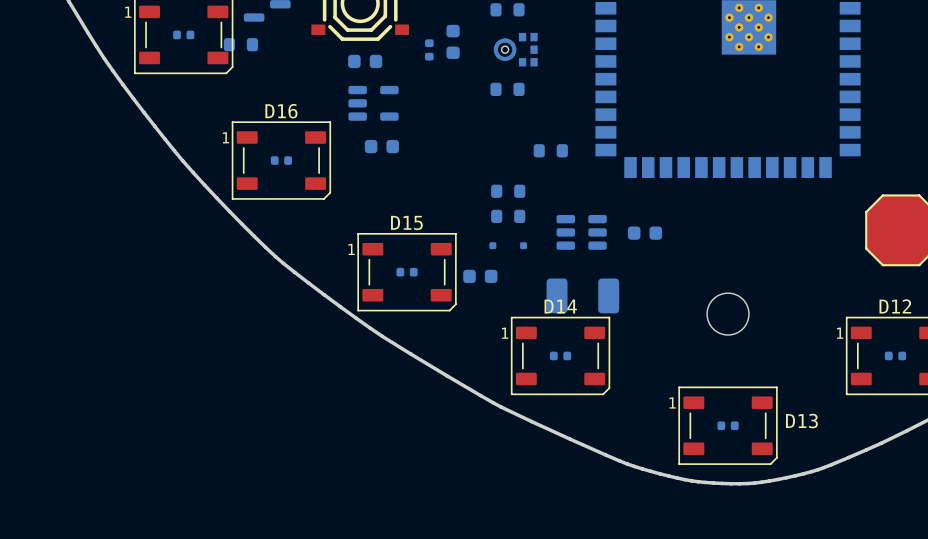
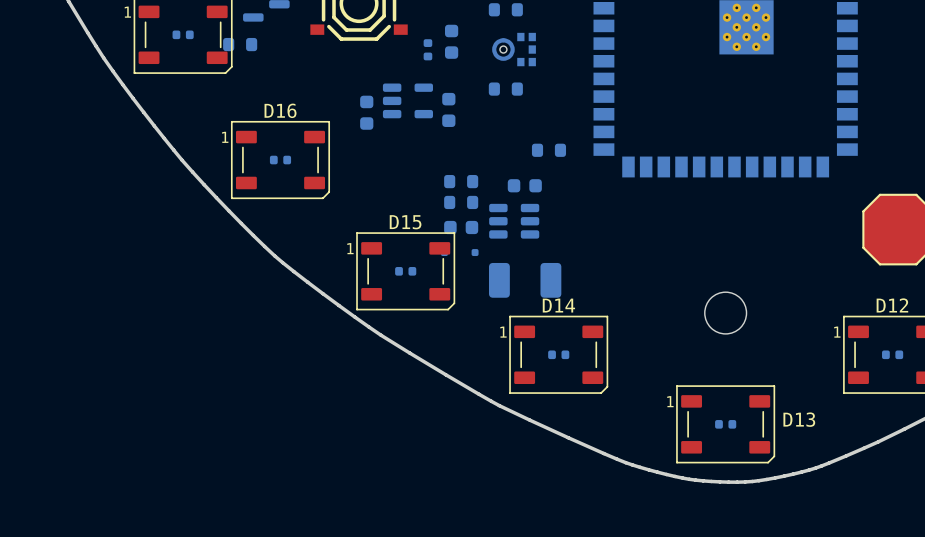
part: (365, 61) -> none
part footprint: [348, 85, 399, 121] -> [360, 95, 374, 130]
part: none -> (407, 100)
part: none -> (448, 109)
part: (381, 146) -> none
part: none -> (461, 181)
part: none -> (524, 185)
part: (508, 191) -> none
part: none -> (461, 202)
part footprint: [491, 209, 526, 224] -> [489, 203, 540, 239]
part: none -> (461, 227)
part: (581, 232) -> none
part: (644, 233) -> none
part position: (508, 245) -> (459, 252)
part: (480, 276) -> none
part position: (582, 295) -> (525, 280)

